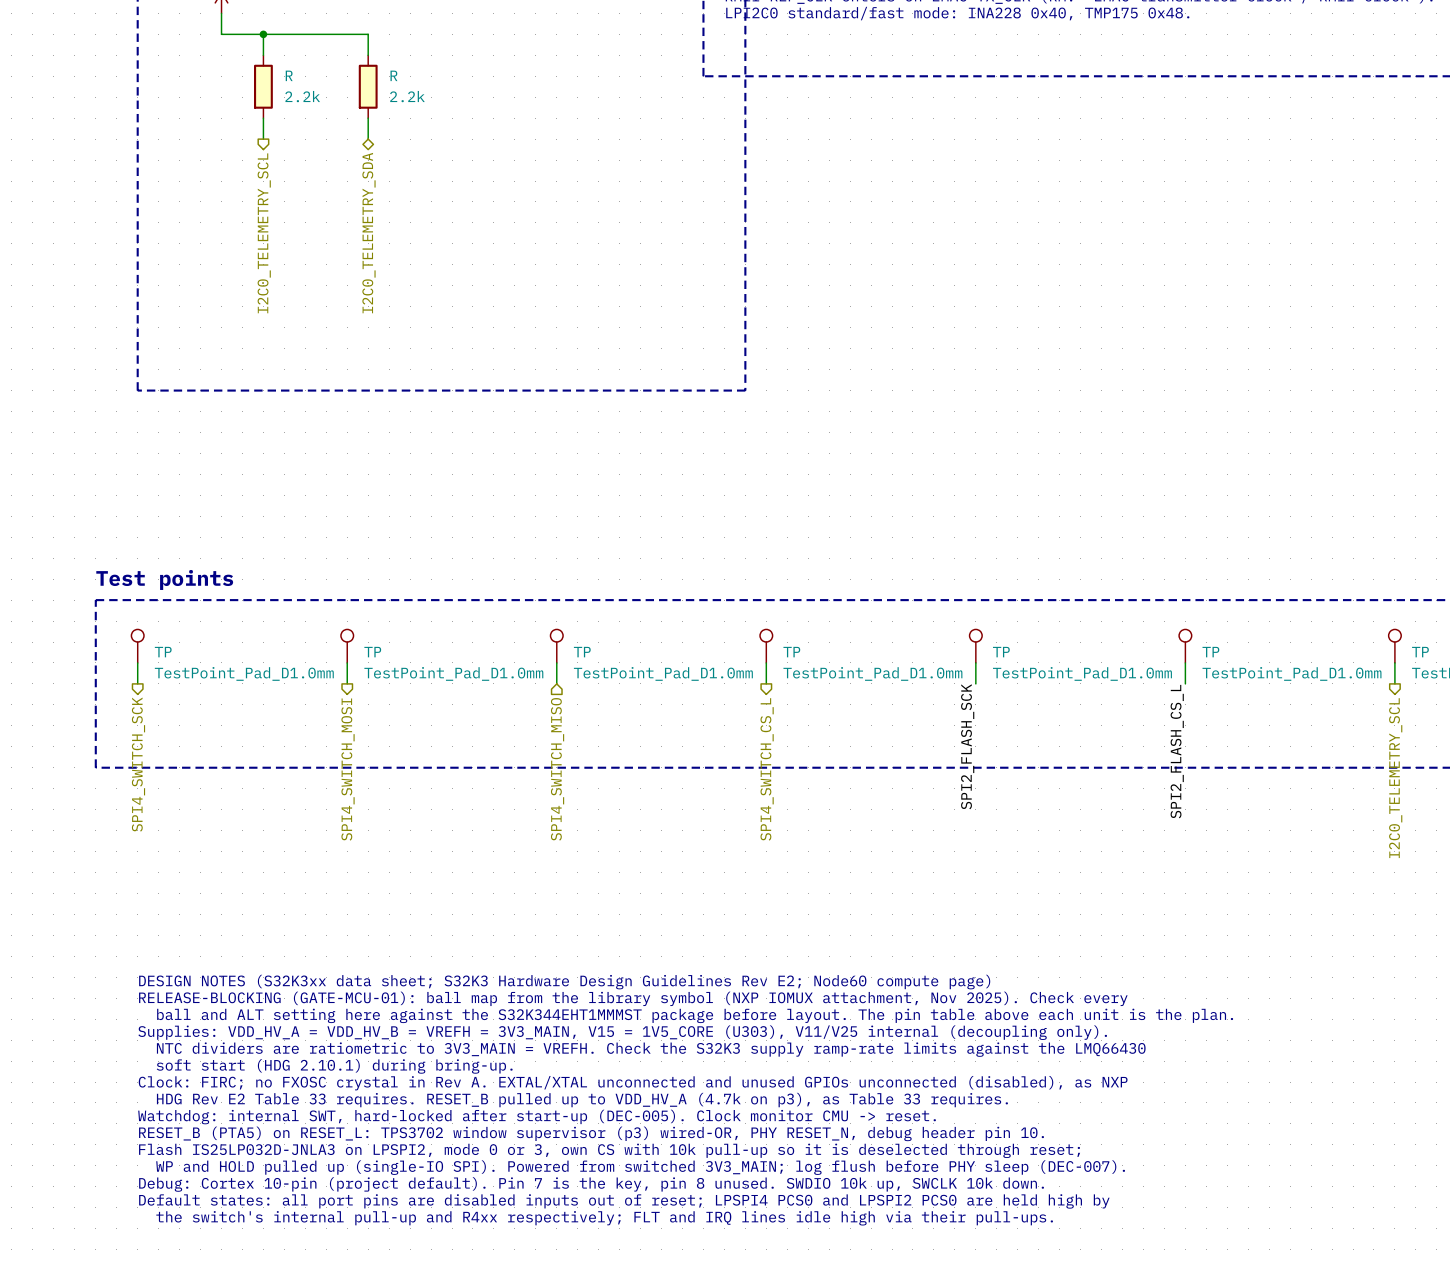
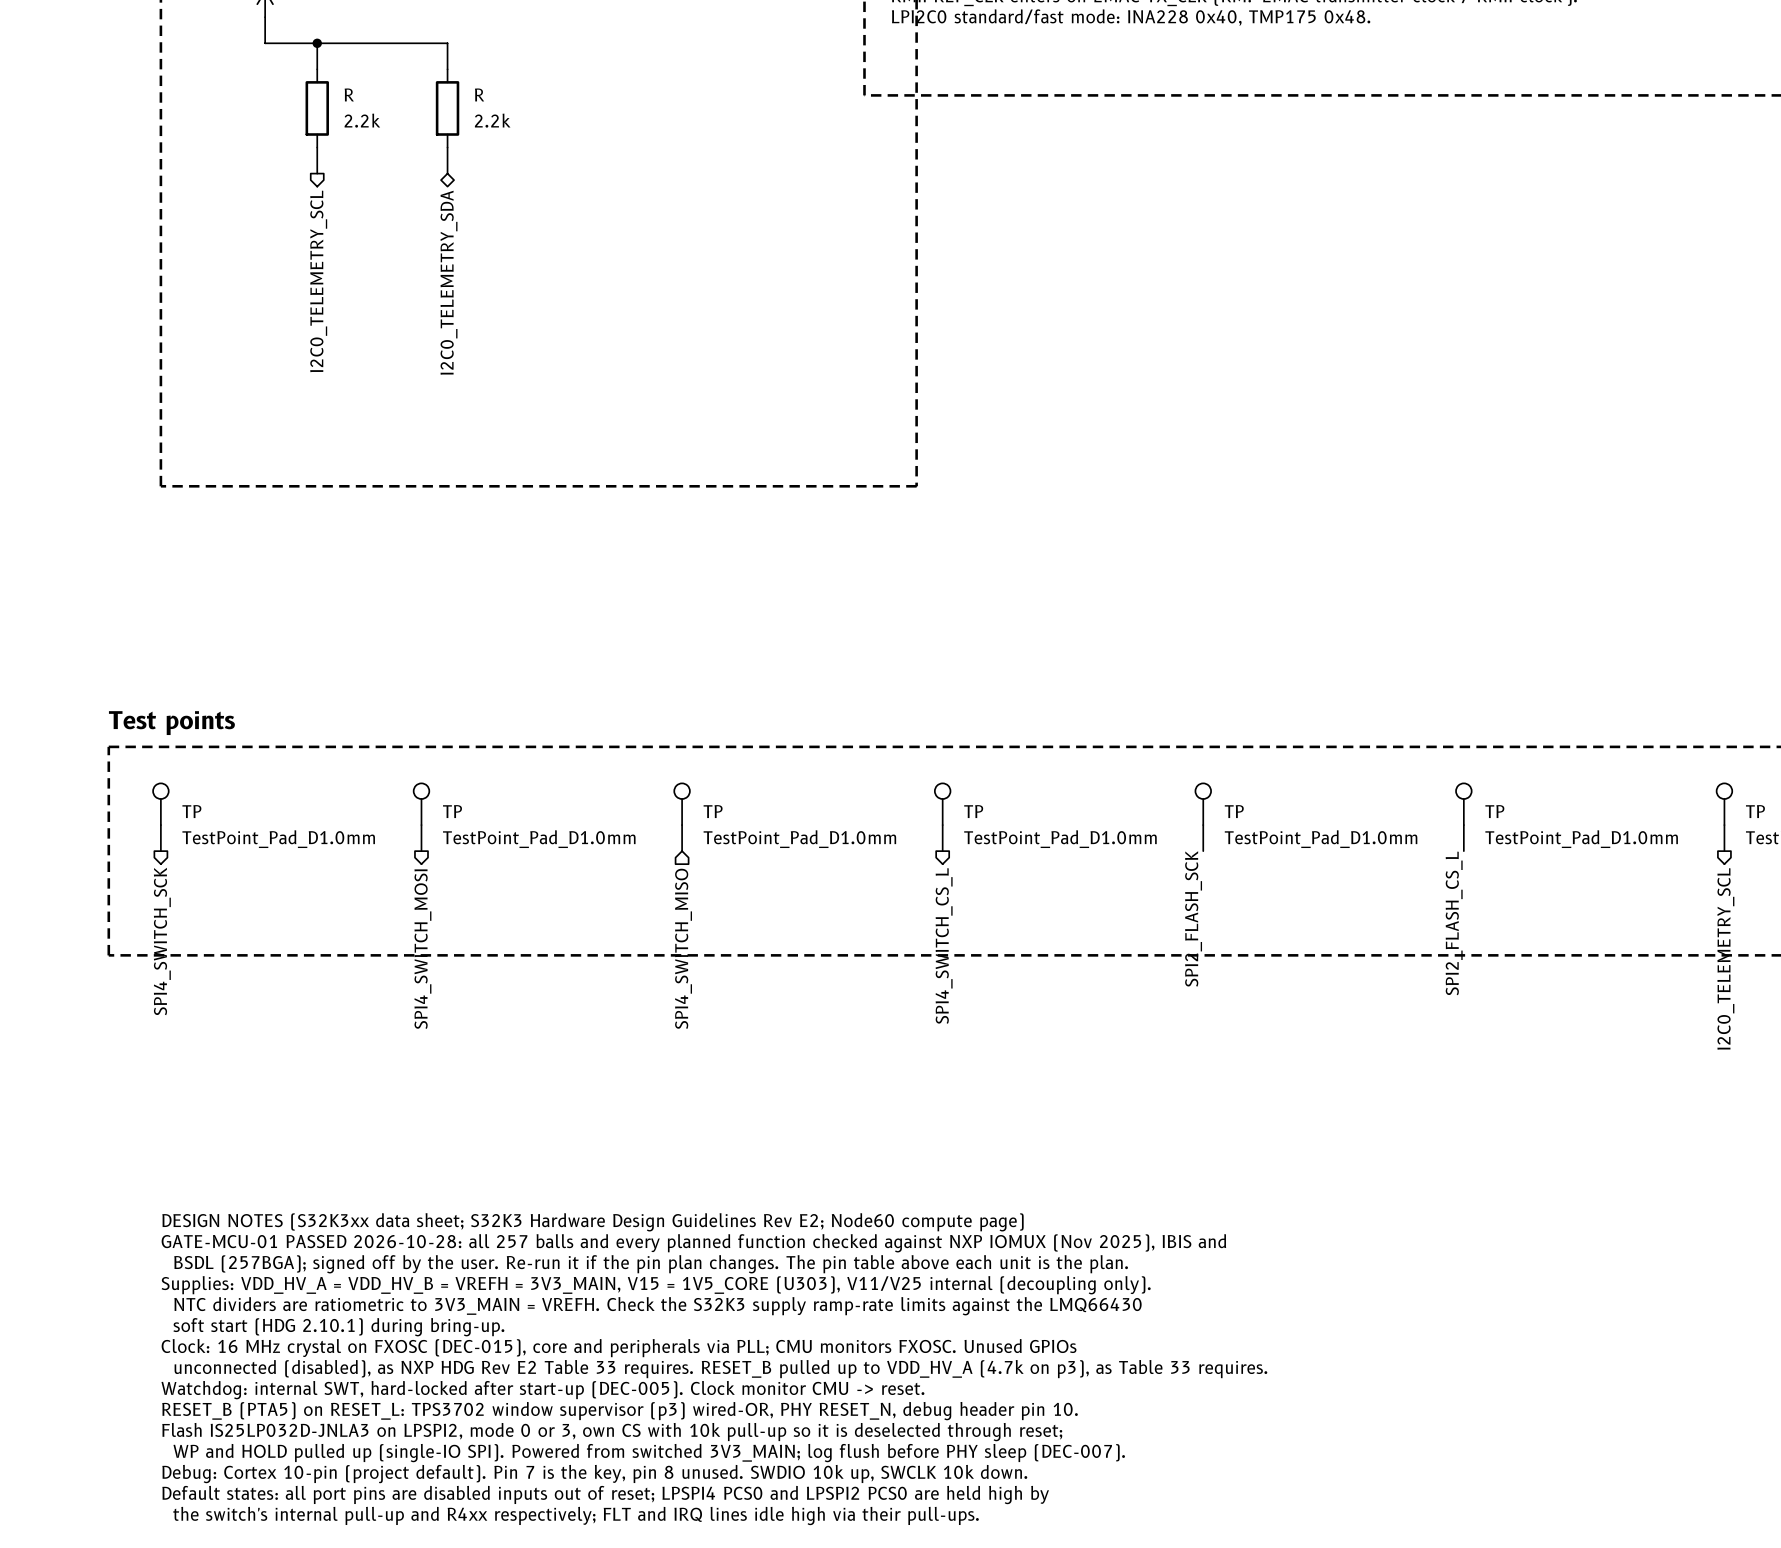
text: RELEASE-BLOCKING (GATE-MCU-01): ball map from the library symbol (NXP IOMUX attachment, Nov 2025). Check every (633, 998) -> GATE-MCU-01 PASSED 2026-10-28: all 257 balls and every planned function checked against NXP IOMUX (Nov 2025), IBIS and (693, 1243)
text: ball and ALT setting here against the S32K344EHT1MMMST package before layout. The pin table above each unit is the plan. (695, 1015) -> BSDL (257BGA); signed off by the user. Re-run it if the pin plan changes. The pin table above each unit is the plan. (651, 1264)
text: Clock: FIRC; no FXOSC crystal in Rev A. EXTAL/XTAL unconnected and unused GPIOs unconnected (disabled), as NXP (633, 1083) -> Clock: 16 MHz crystal on FXOSC (DEC-015), core and peripherals via PLL; CMU monitors FXOSC. Unused GPIOs (619, 1348)
text: HDG Rev E2 Table 33 requires. RESET_B pulled up to VDD_HV_A (4.7k on p3), as Table 33 requires. (582, 1100) -> unconnected (disabled), as NXP HDG Rev E2 Table 33 requires. RESET_B pulled up to VDD_HV_A (4.7k on p3), as Table 33 requires. (720, 1369)

